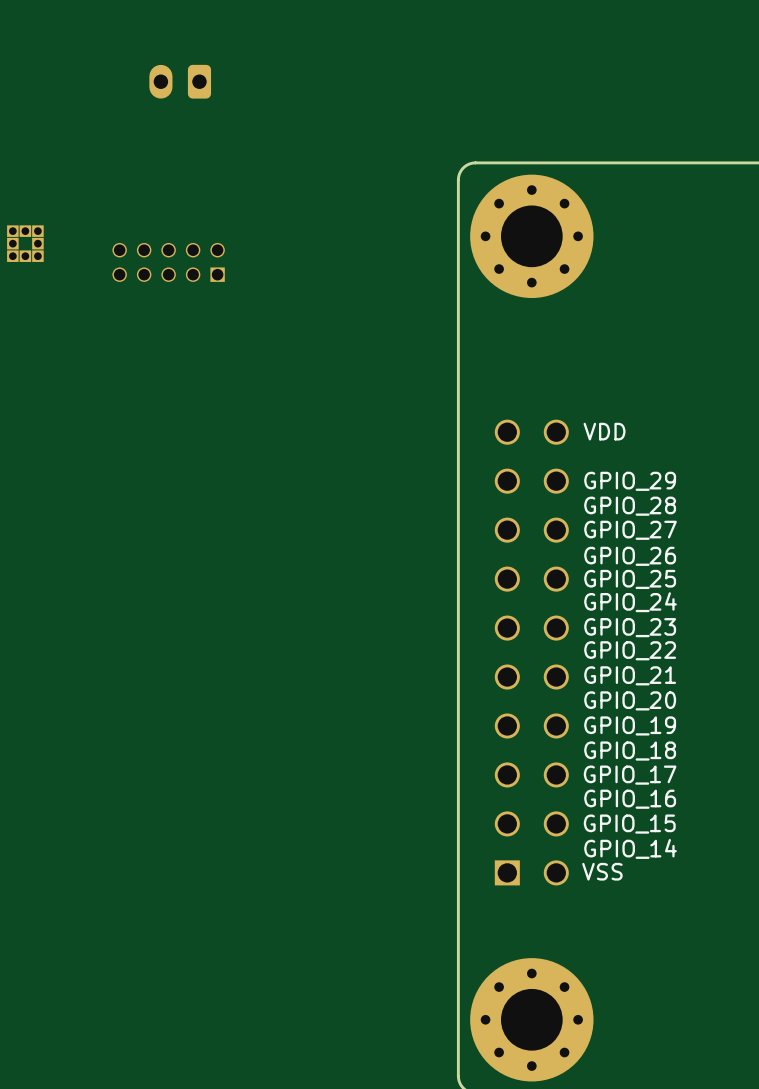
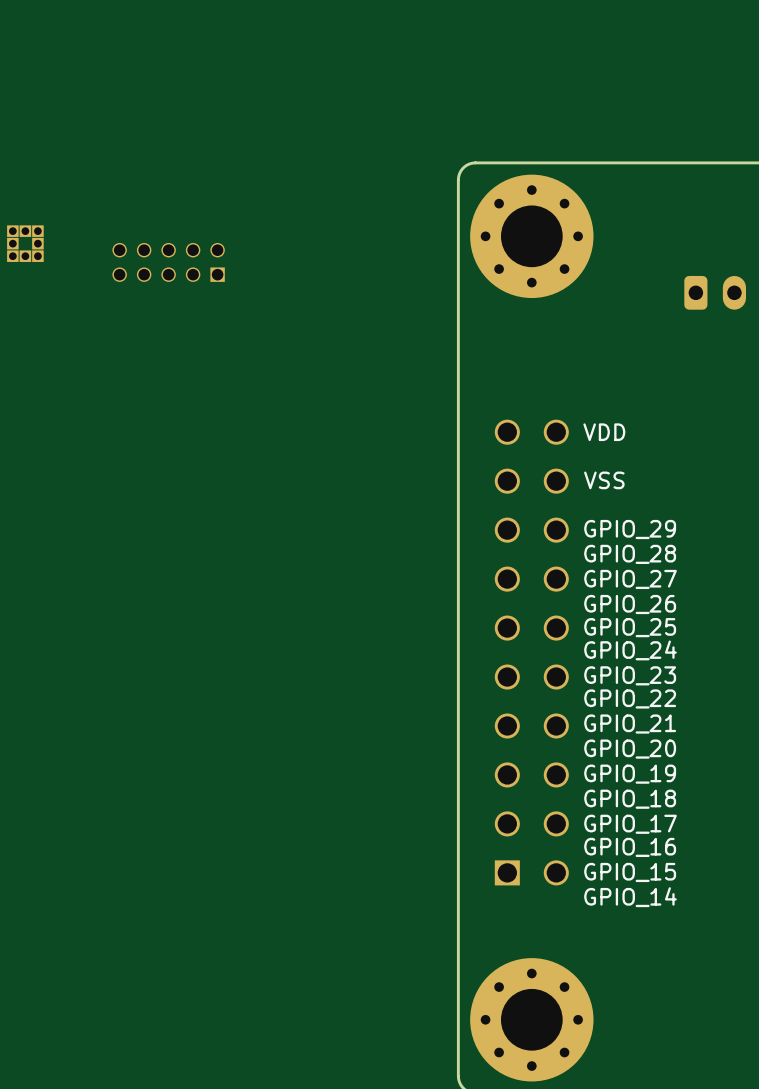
part: (180, 81) -> none
part: none -> (715, 292)
part footprint: [494, 419, 569, 886] -> [494, 419, 569, 886]

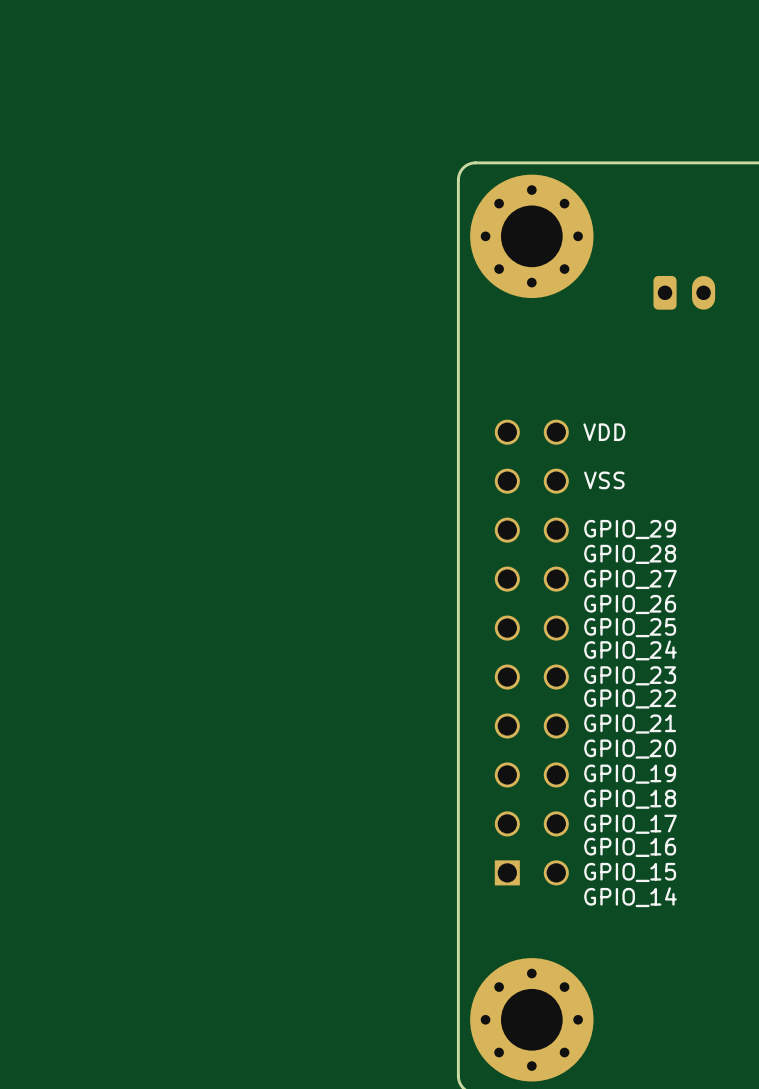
part: (25, 243) -> none
part: (168, 262) -> none
part position: (715, 292) -> (684, 292)

